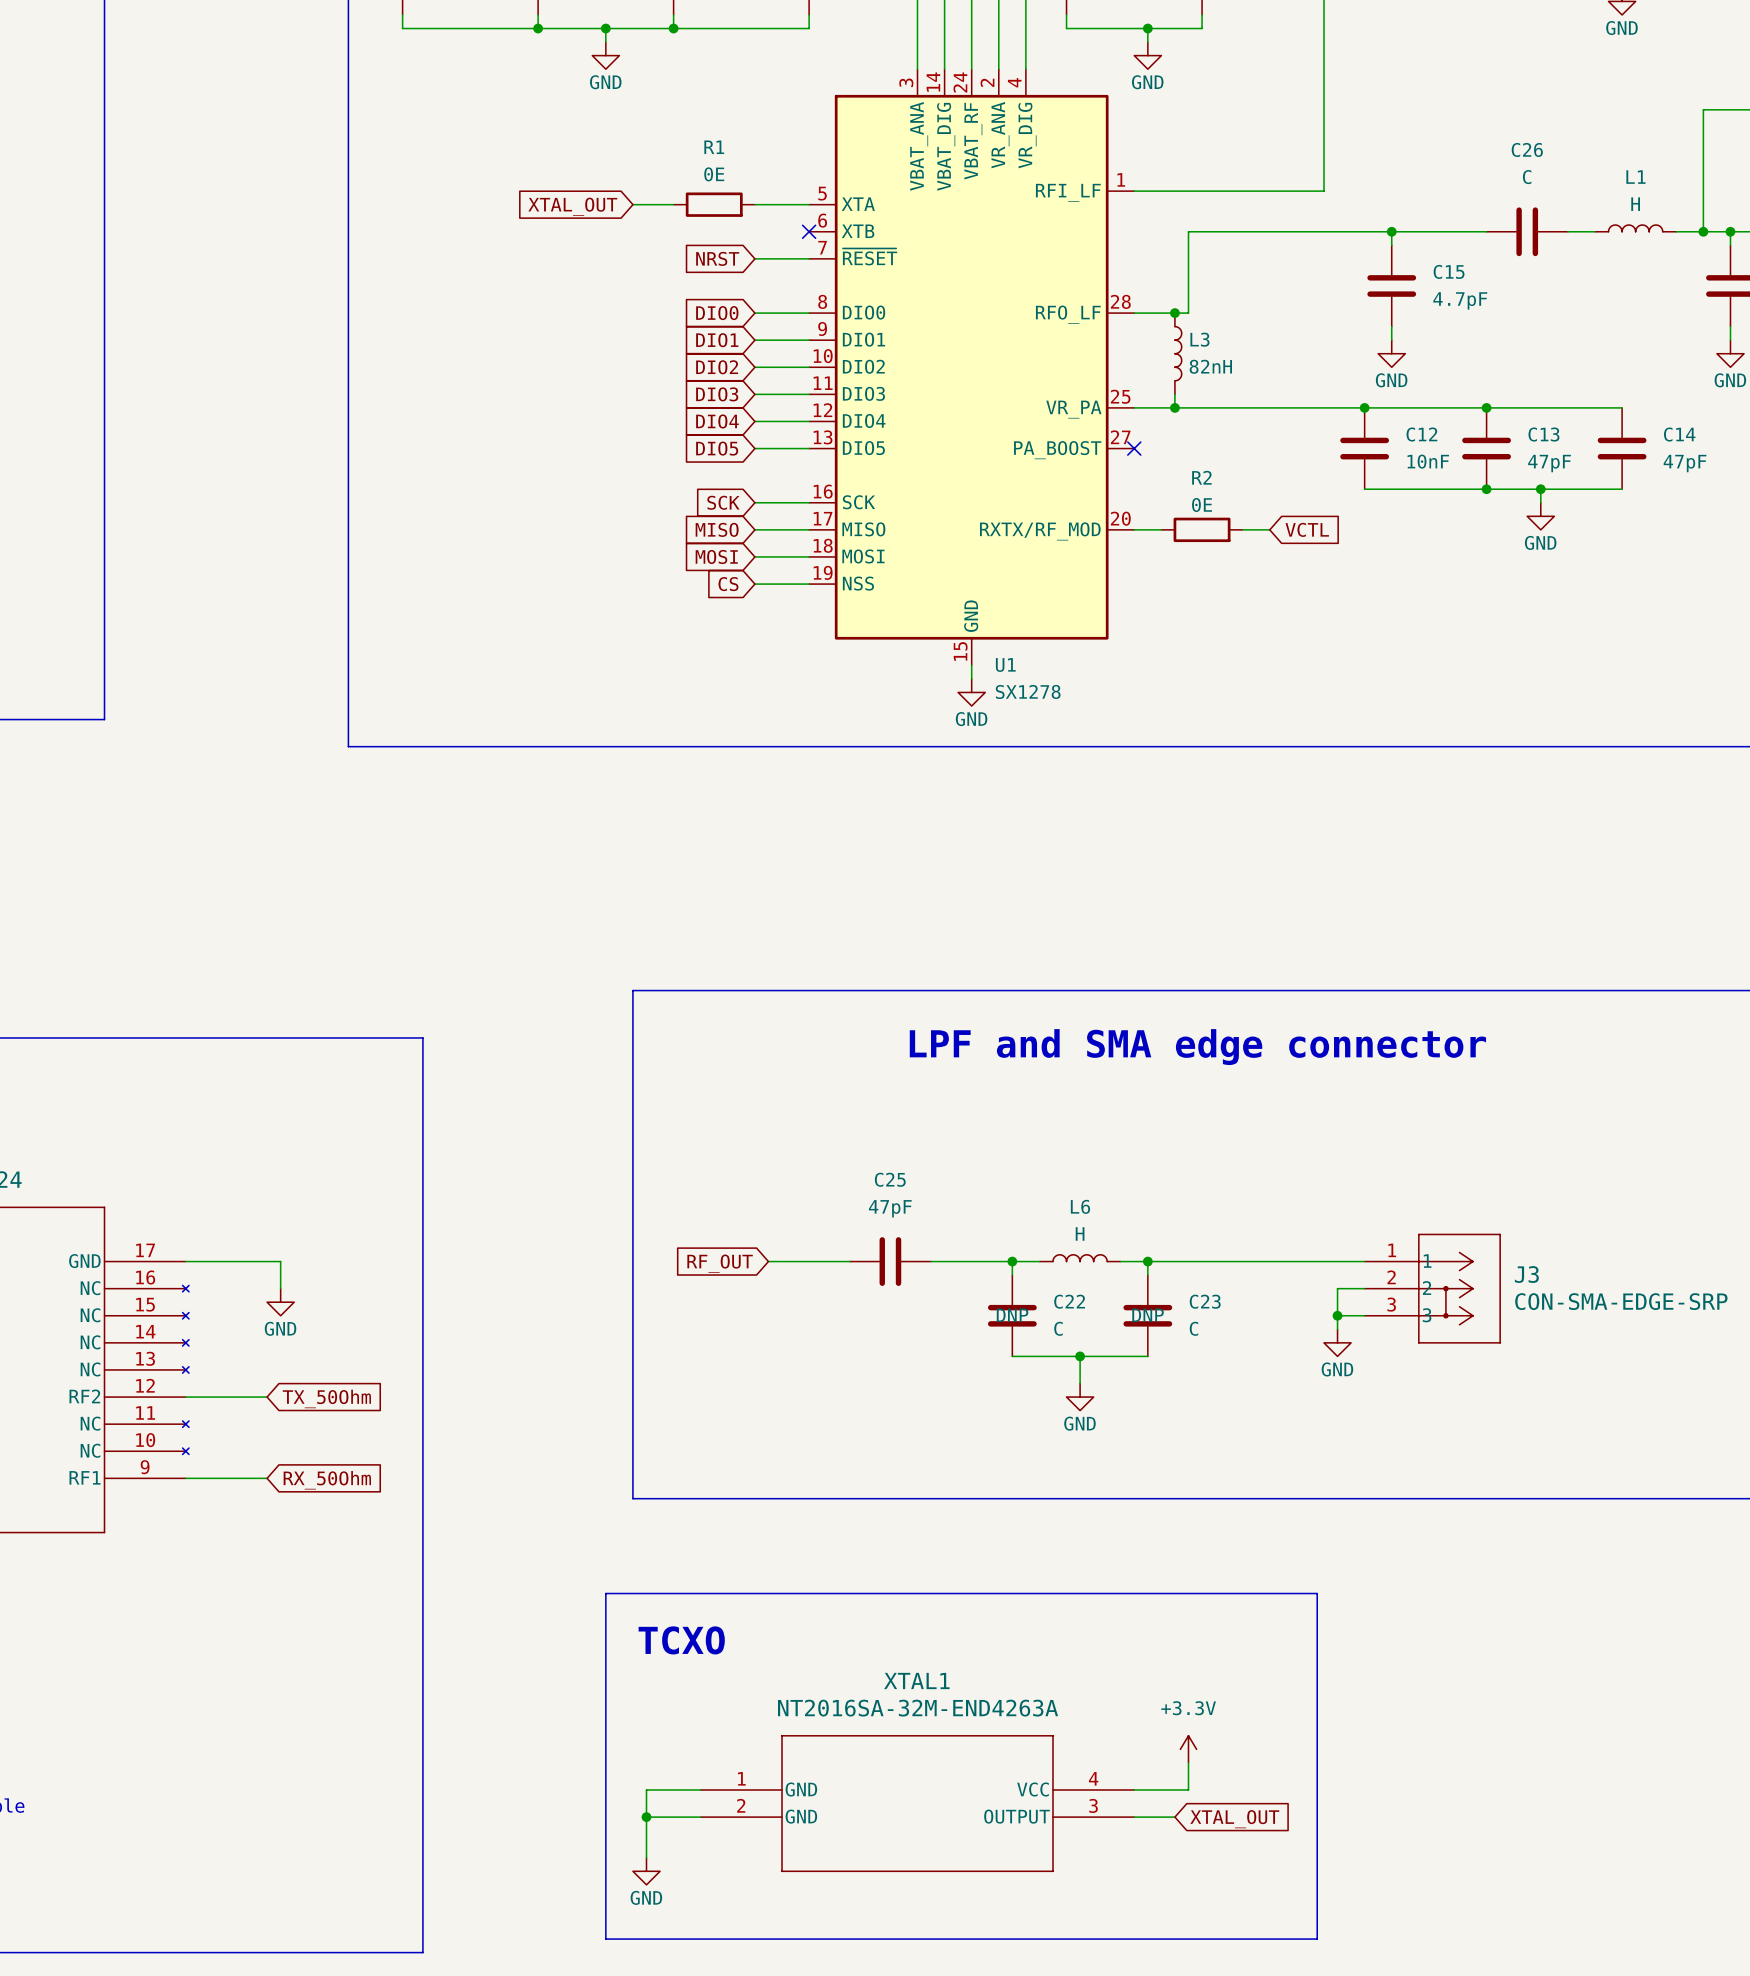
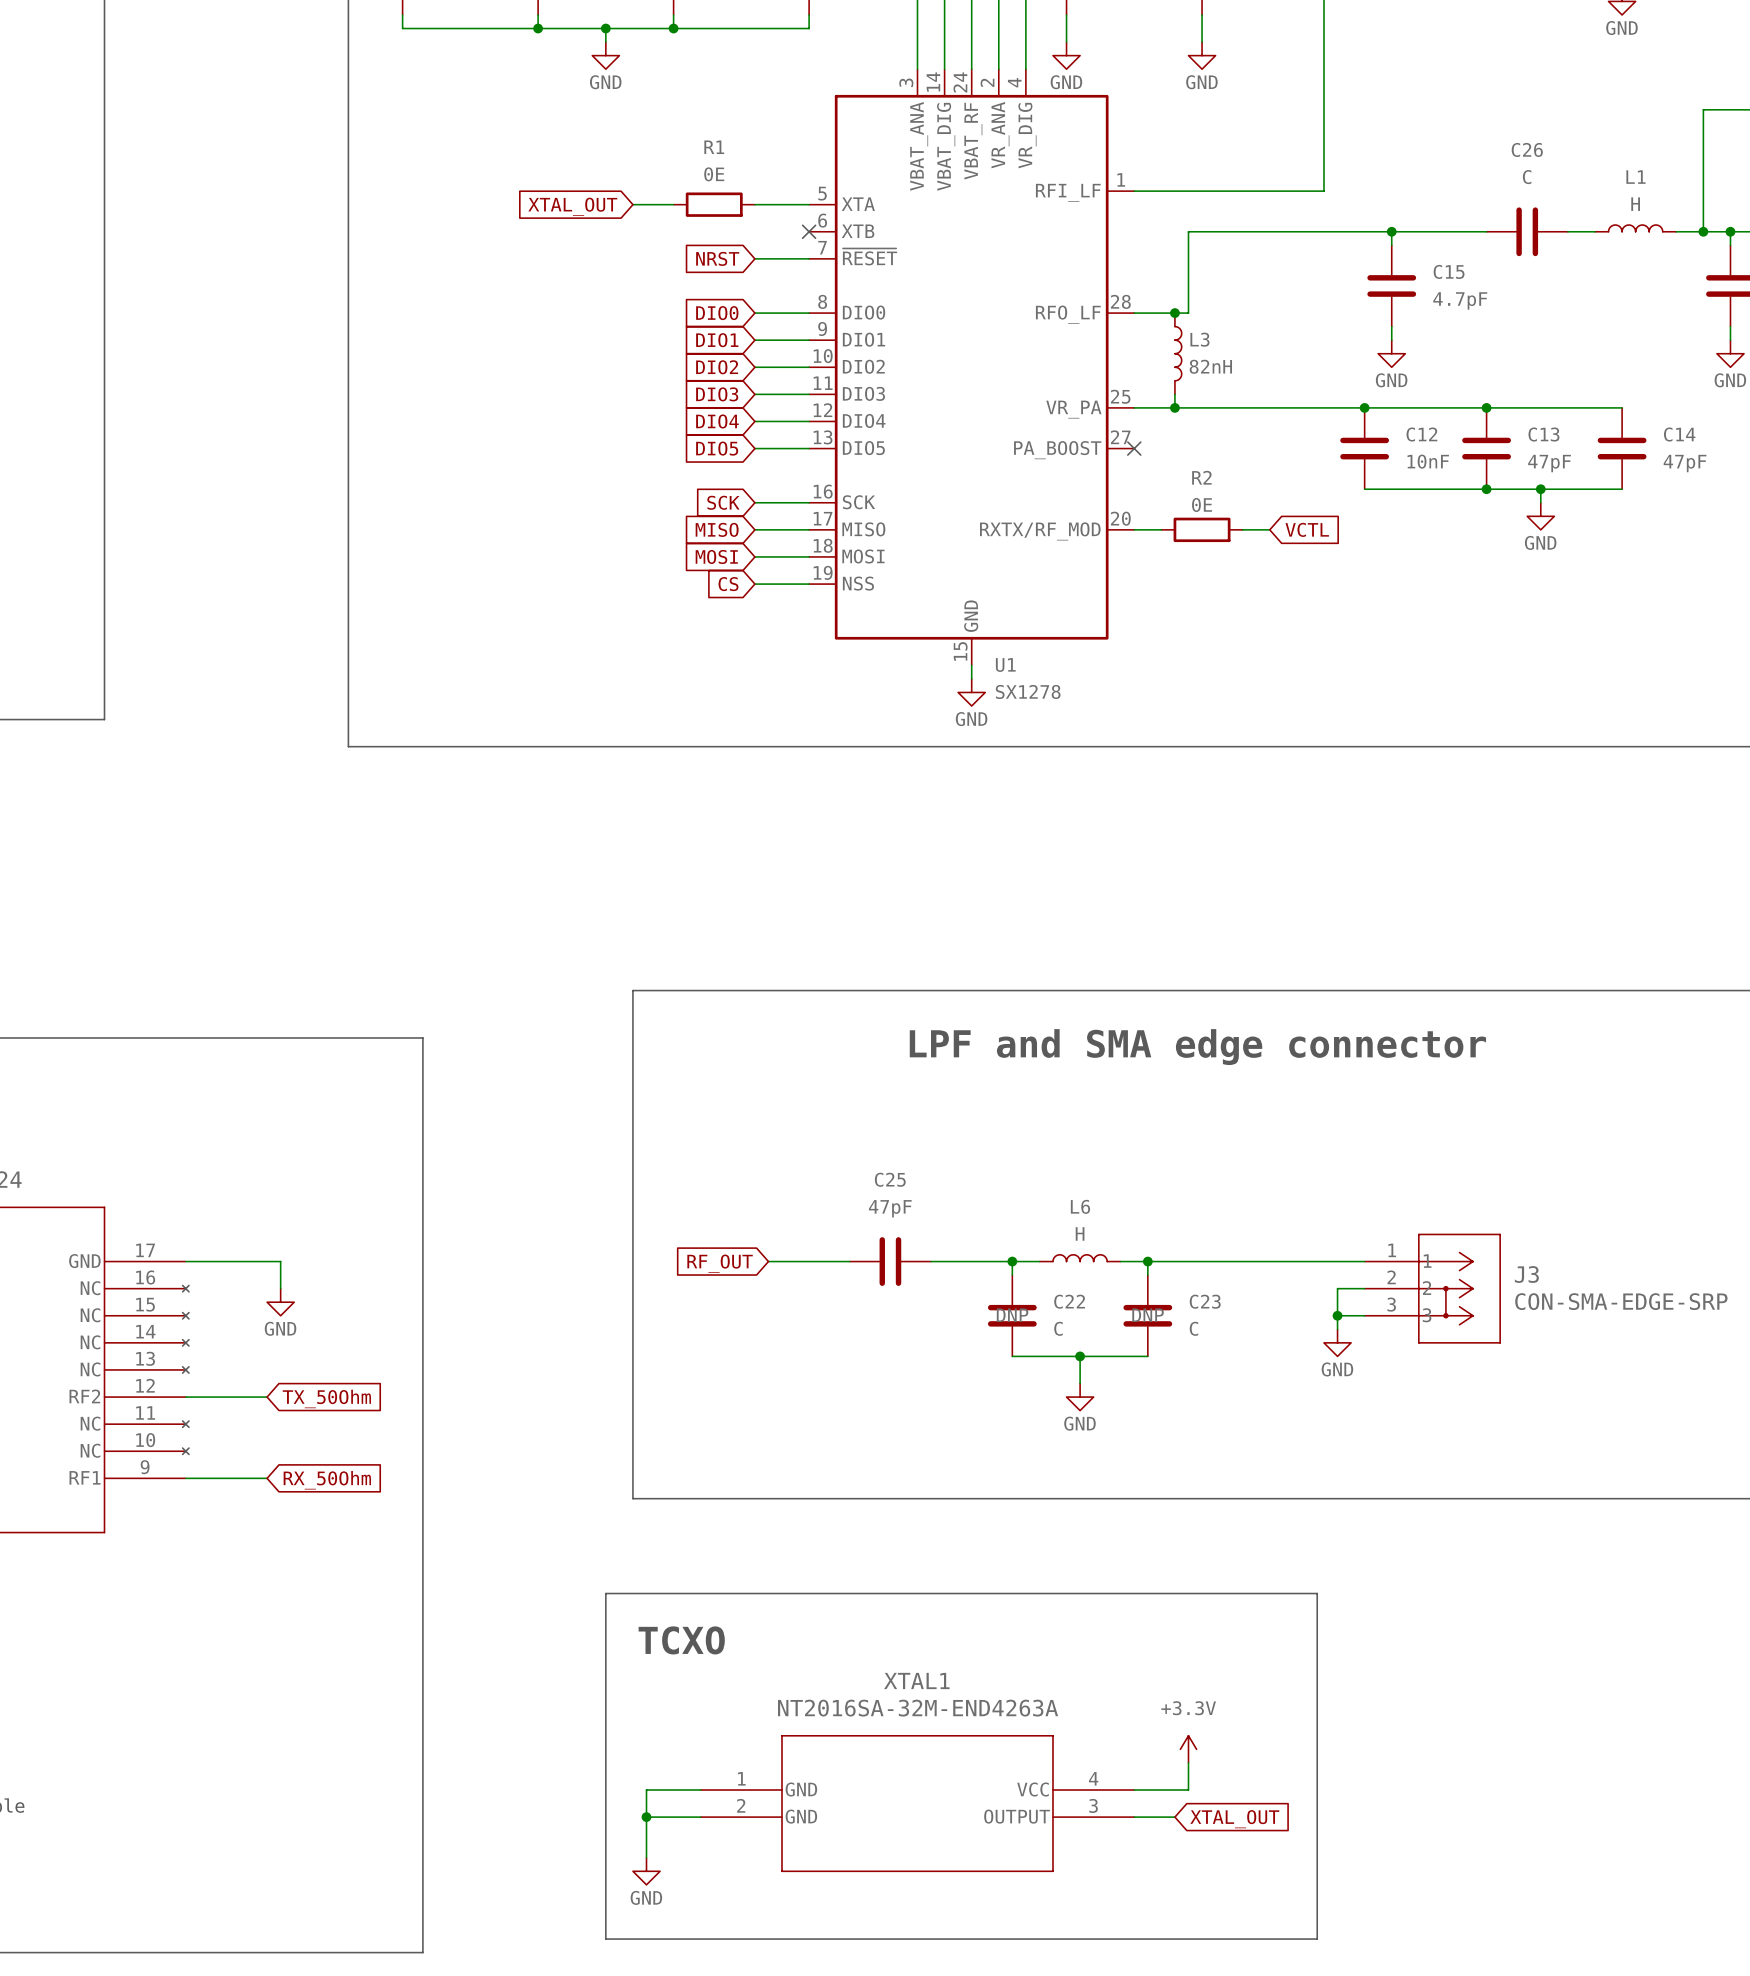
wire: (1066, 28) (1202, 28) -> (1066, 28) (1066, 42)
wire: (1147, 28) (1147, 42) -> (1202, 28) (1202, 42)
junction: (1147, 28) -> none
power symbol: none -> GND (1066, 55)
power symbol: GND (1147, 55) -> none
power symbol: none -> GND (1202, 55)

